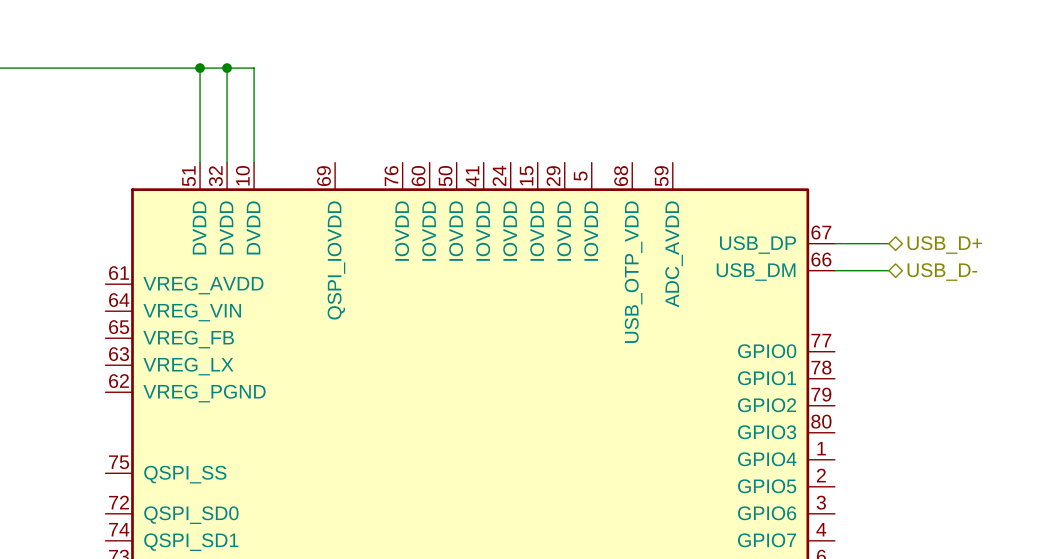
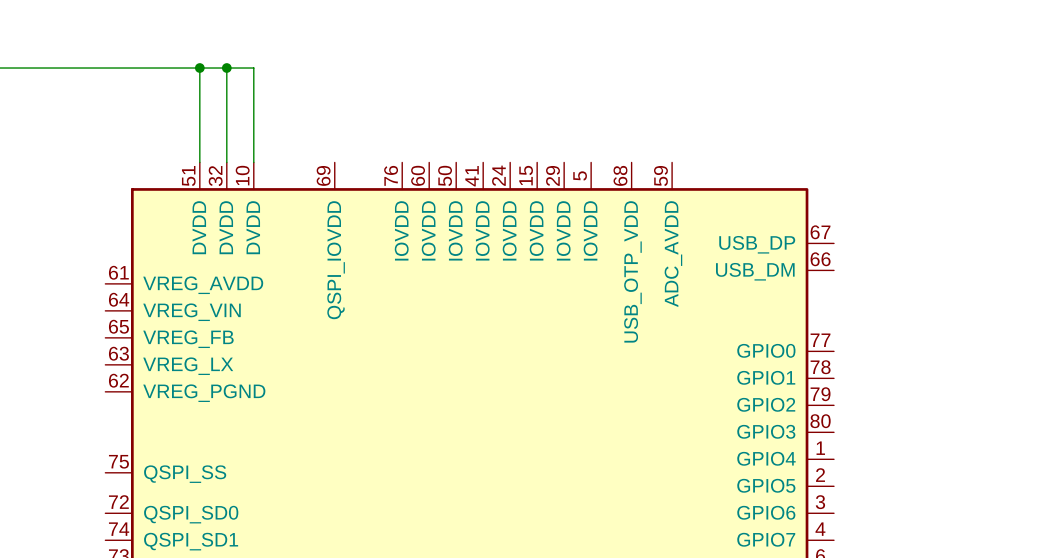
wire: (834, 243) (888, 243) -> none
hierarchical label: USB_D+ (944, 245) -> none
wire: (834, 270) (888, 270) -> none
hierarchical label: USB_D- (942, 272) -> none

